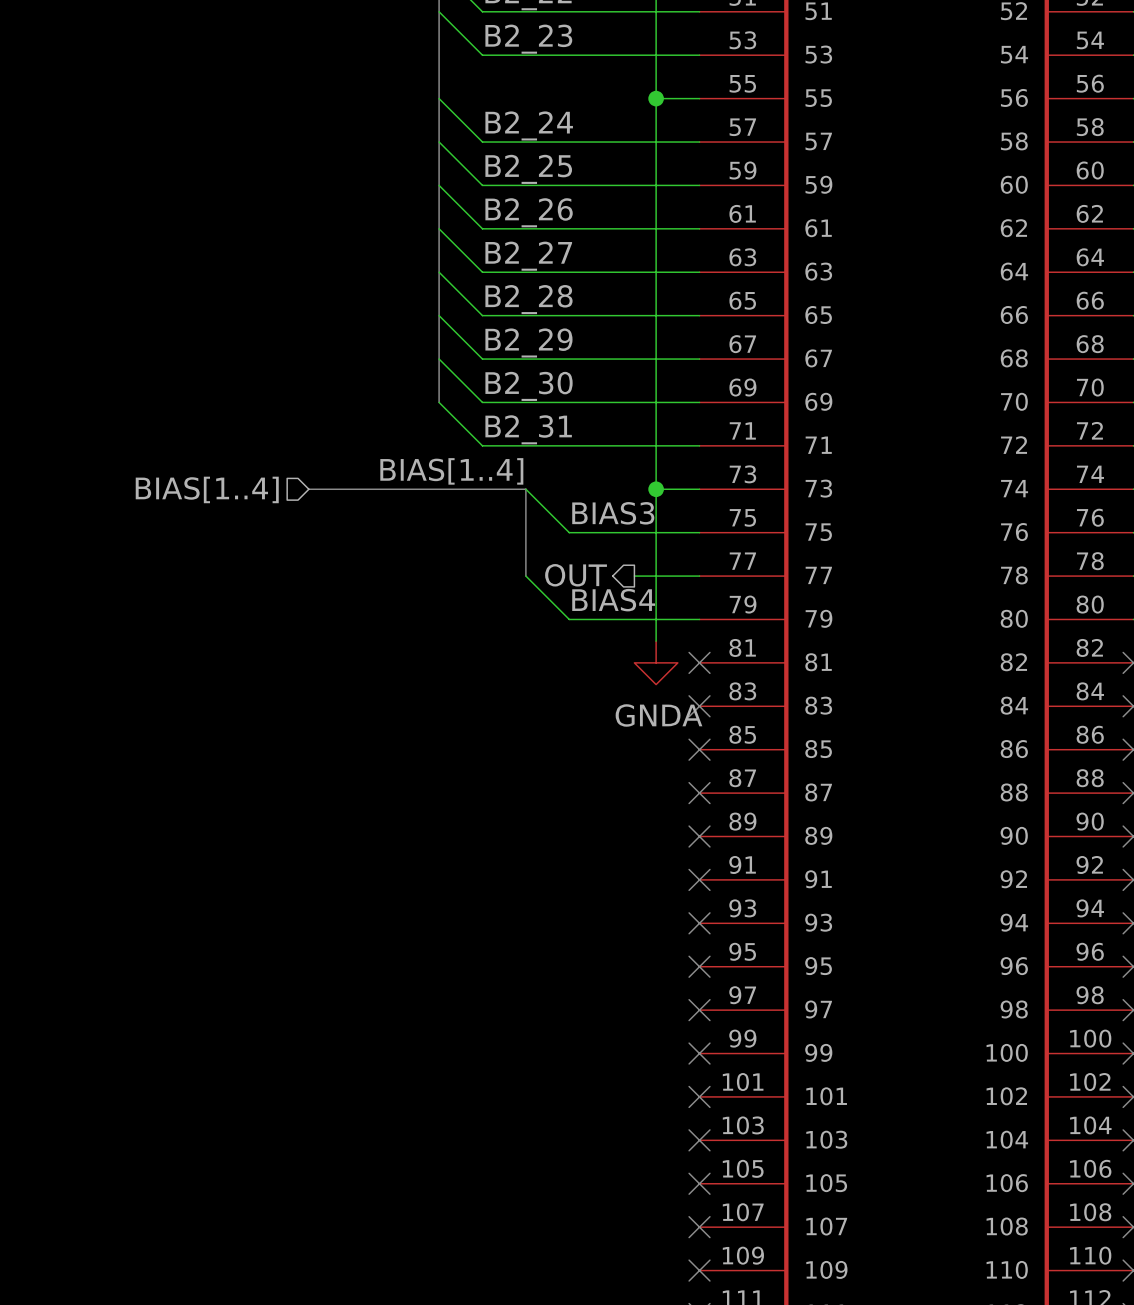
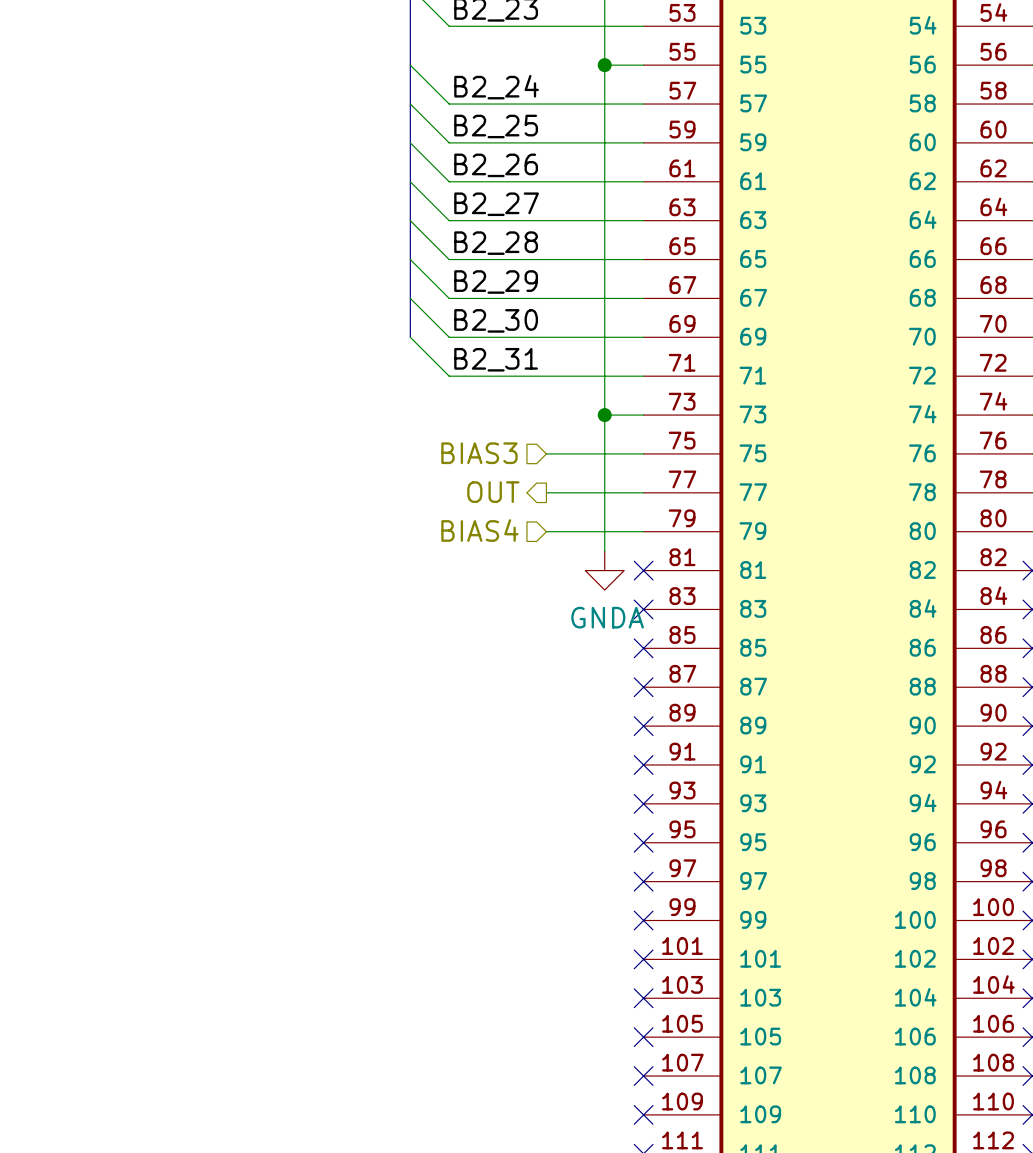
label: BIAS[1..4] (451, 471) -> none
hierarchical label: BIAS[1..4] (207, 489) -> none
bus: (308, 489) (525, 489) (525, 576) -> none
wire: (525, 489) (569, 532) (591, 532) -> none
label: BIAS3 (613, 513) -> none
hierarchical label: none -> BIAS3 (479, 453)
hierarchical label position: OUT (576, 575) -> OUT (493, 492)
wire: (525, 576) (569, 619) (591, 619) -> none
wire: none -> (546, 492) (585, 492)
label: BIAS4 (613, 600) -> none
hierarchical label: none -> BIAS4 (479, 530)

